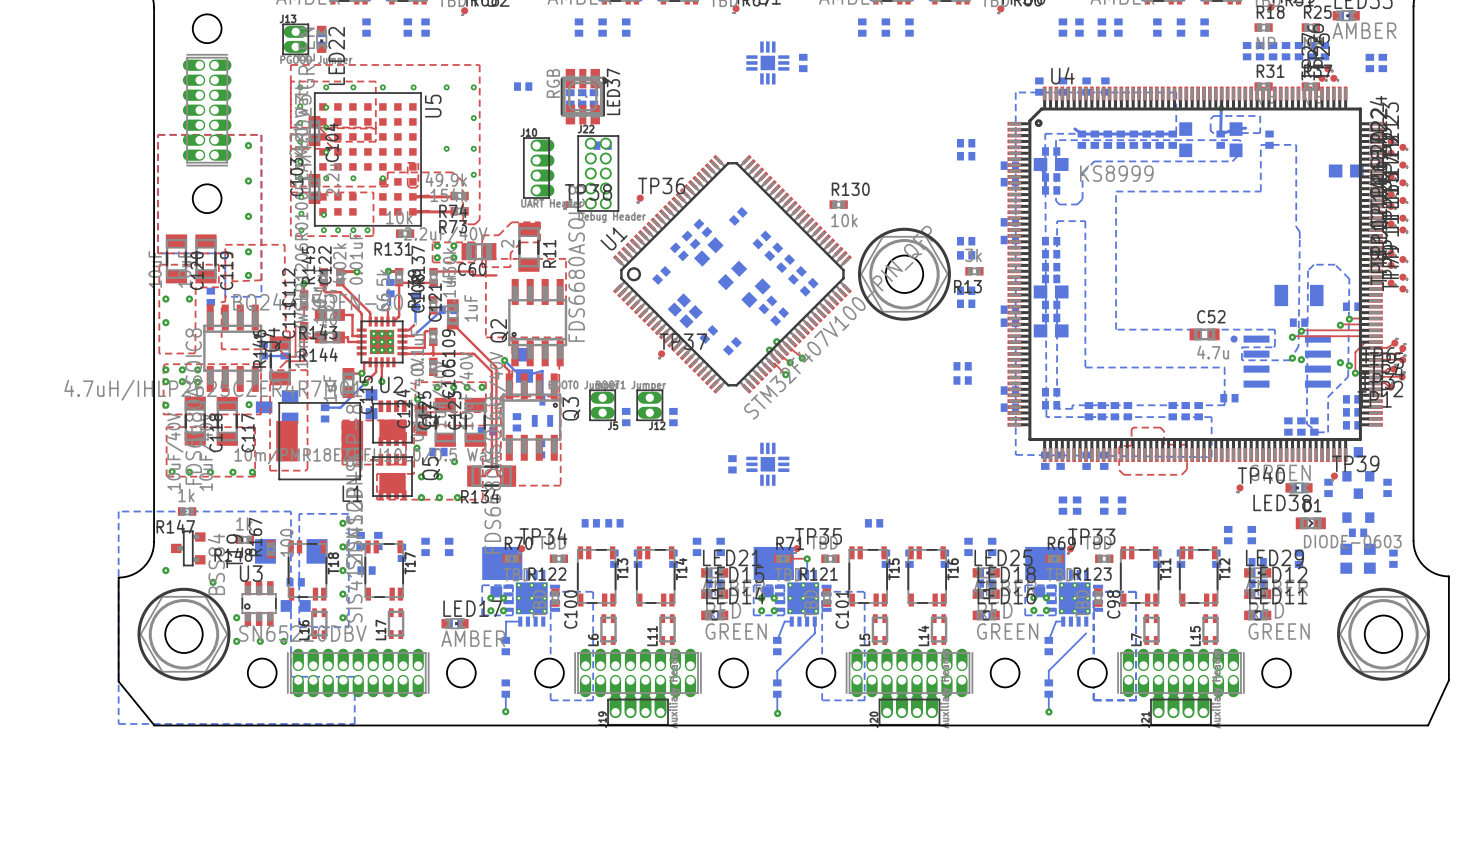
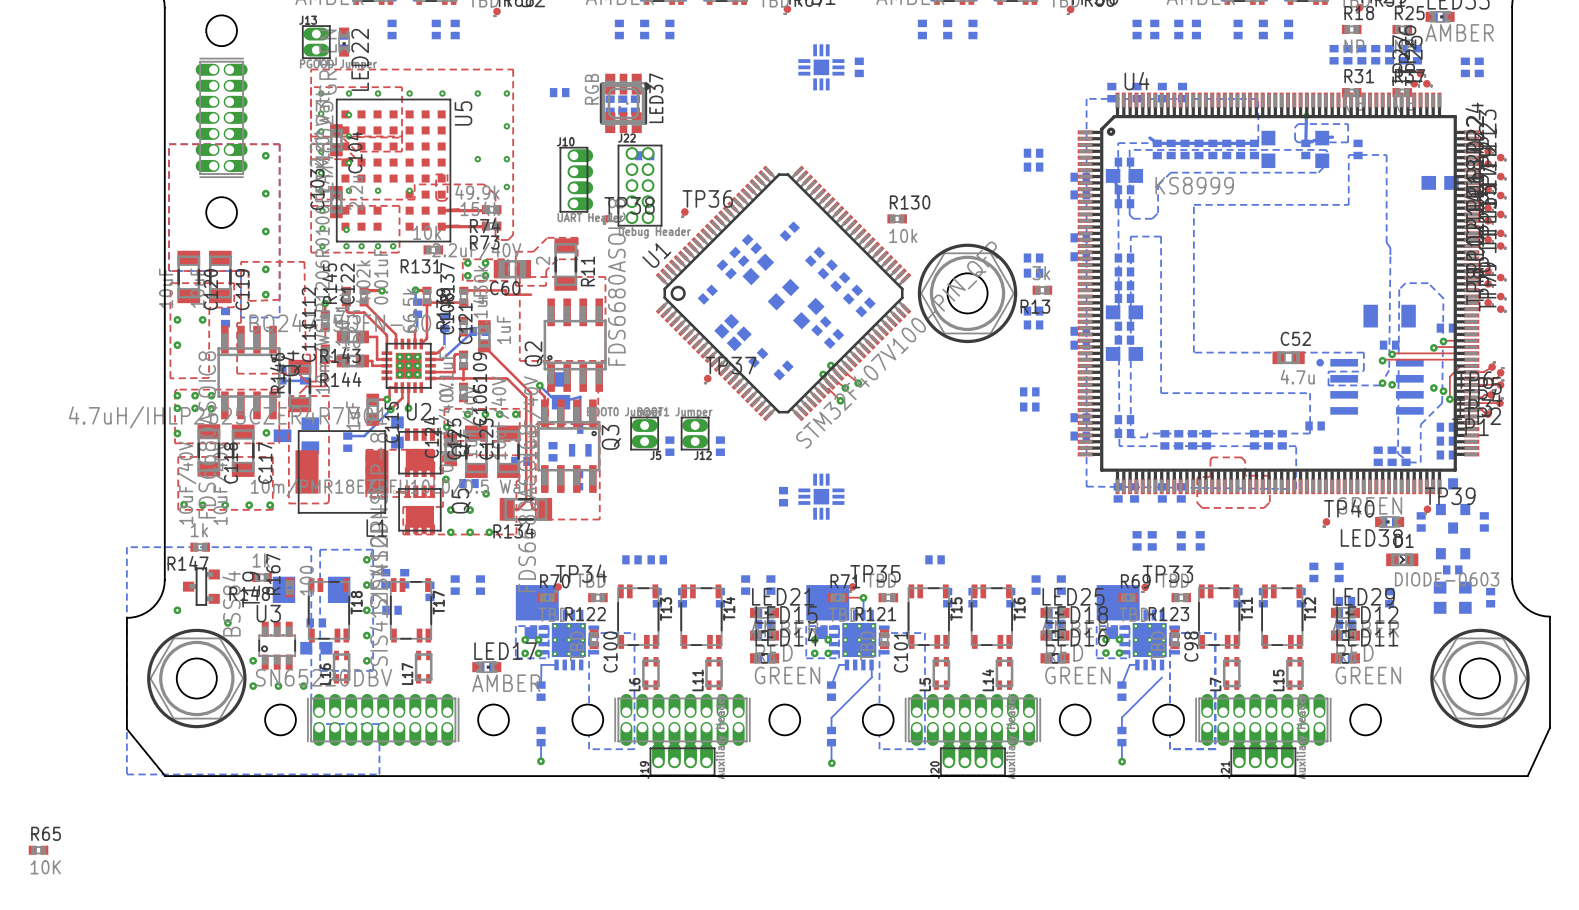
R65: none -> 10K (38, 850)

